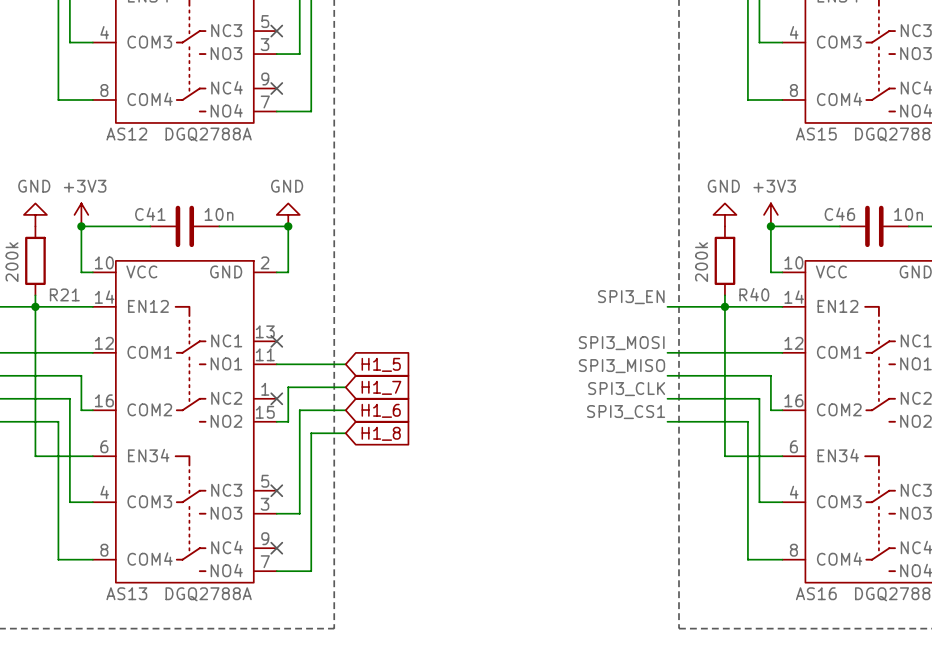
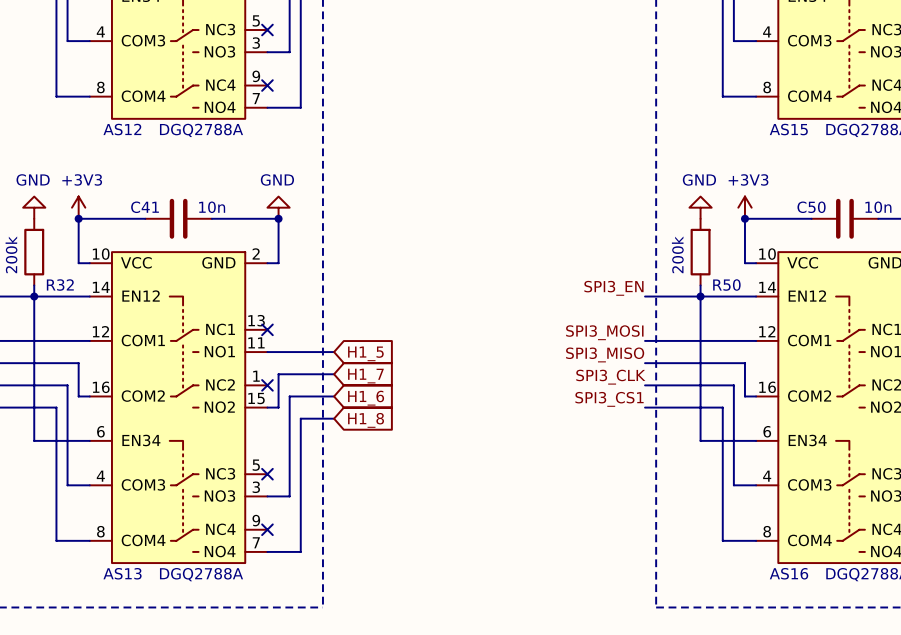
C46 name: C46 (839, 214) -> C50 (811, 207)
R21 name: R21 (64, 294) -> R32 (60, 285)
R40 name: R40 (754, 294) -> R50 (726, 285)

